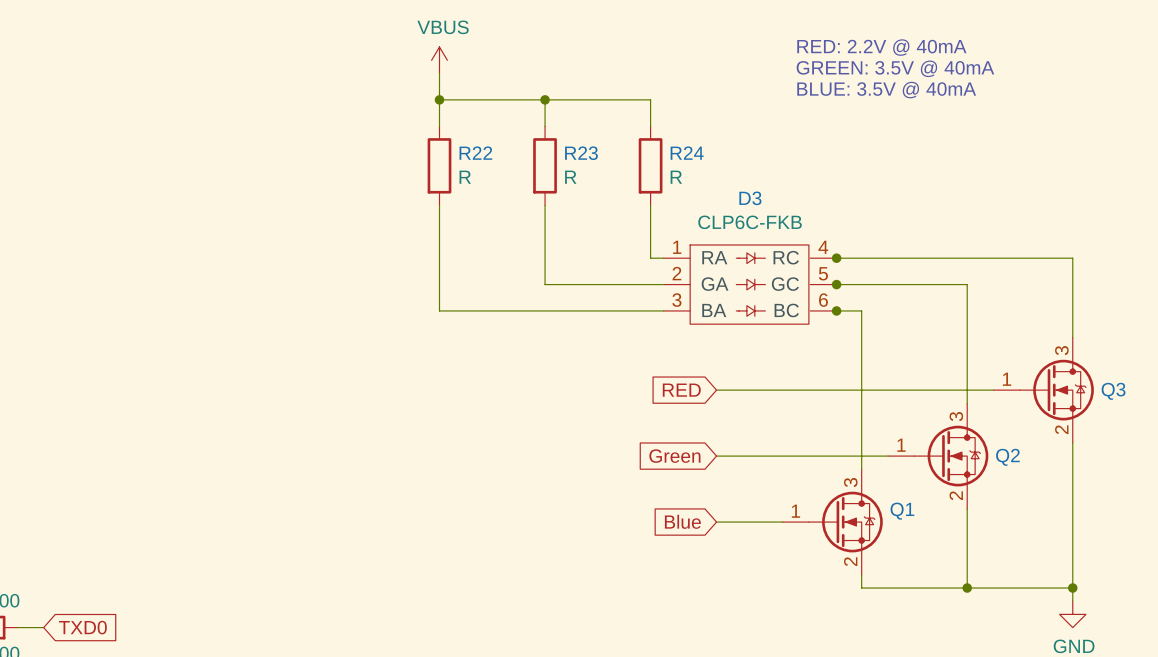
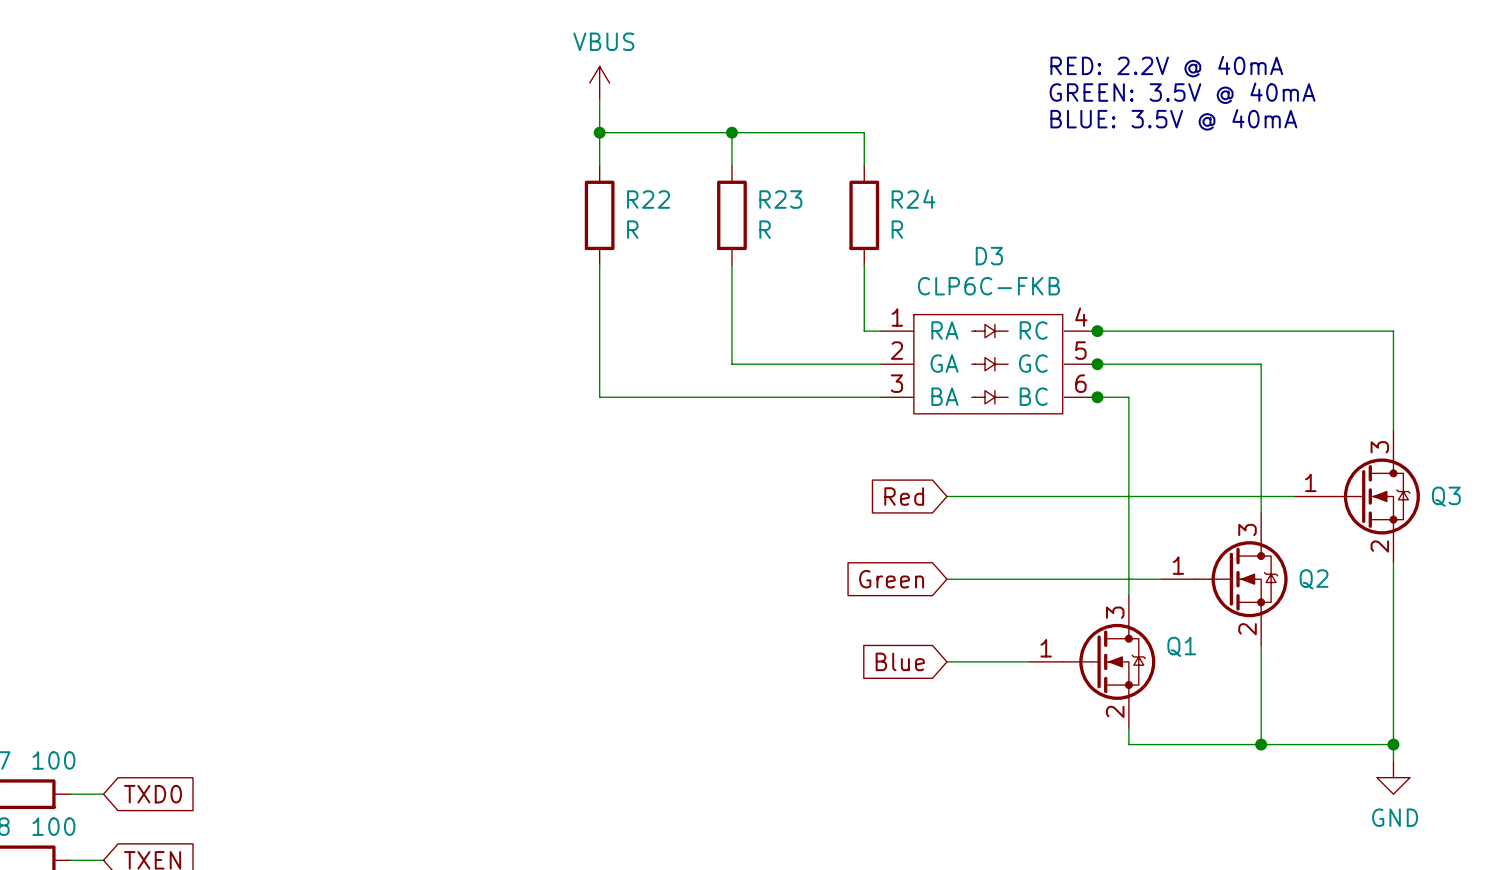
global label: RED (681, 390) -> Red (904, 496)

